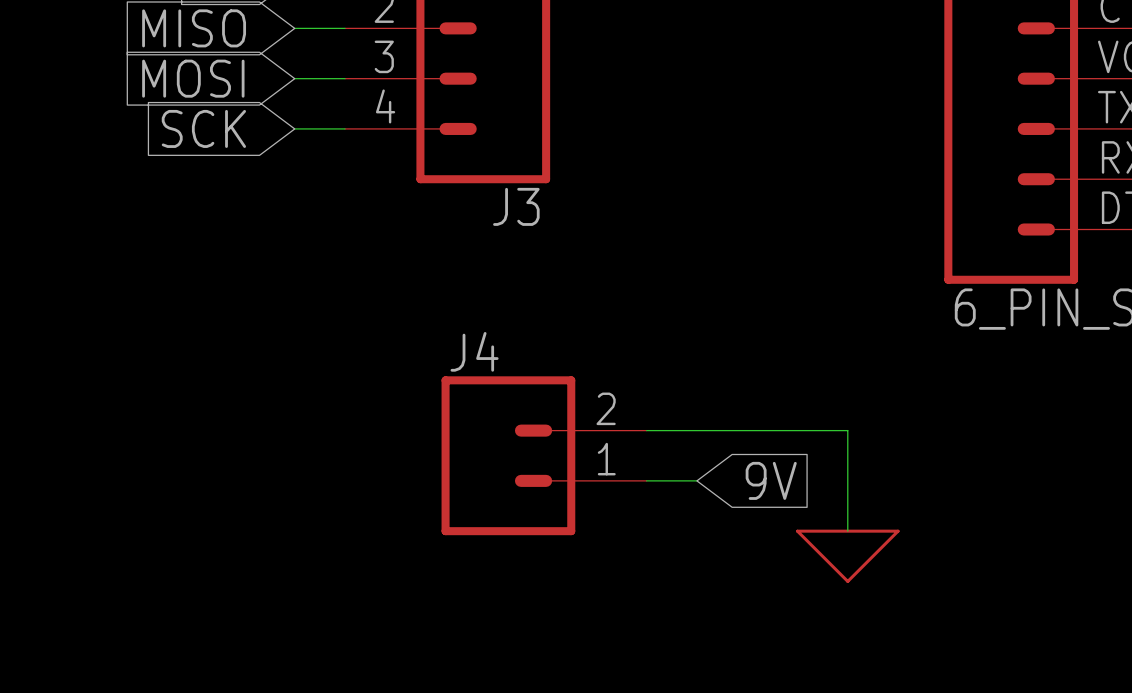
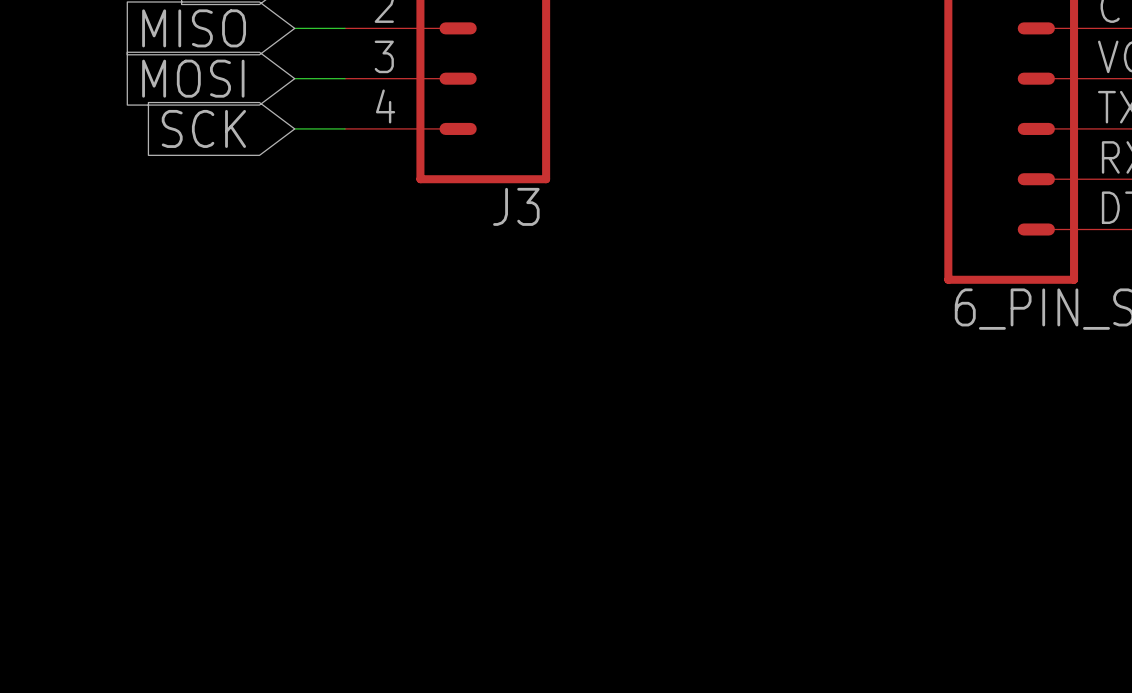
wire: (646, 430) (847, 430) (847, 531) -> none
J4: (544, 455) -> none
wire: (646, 480) (696, 480) -> none
global label: 9V (771, 480) -> none
power symbol: (847, 556) -> none

